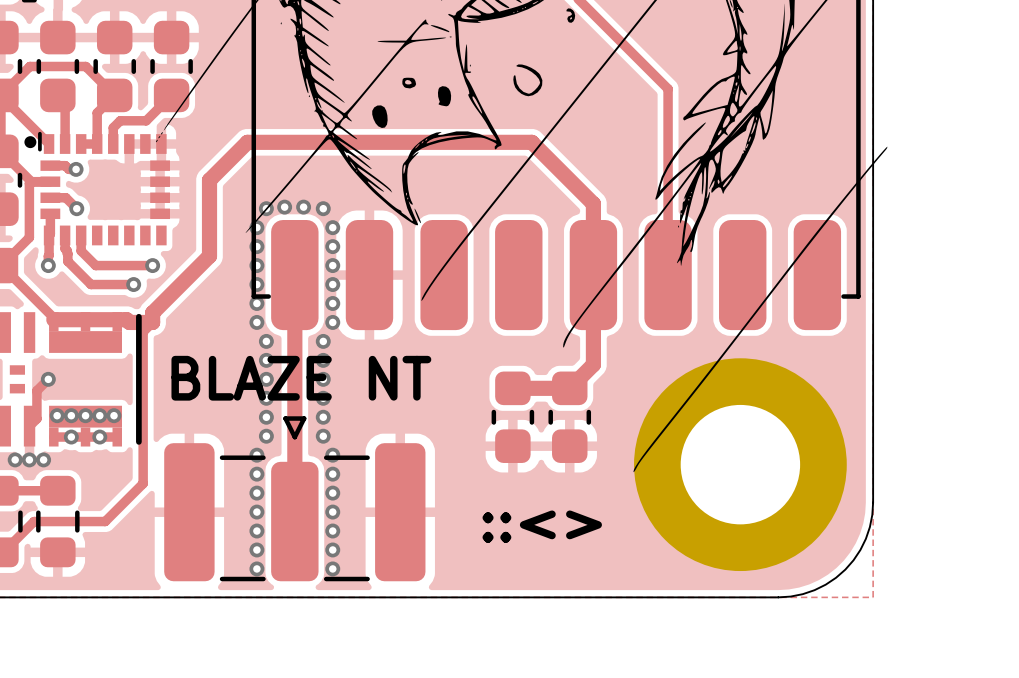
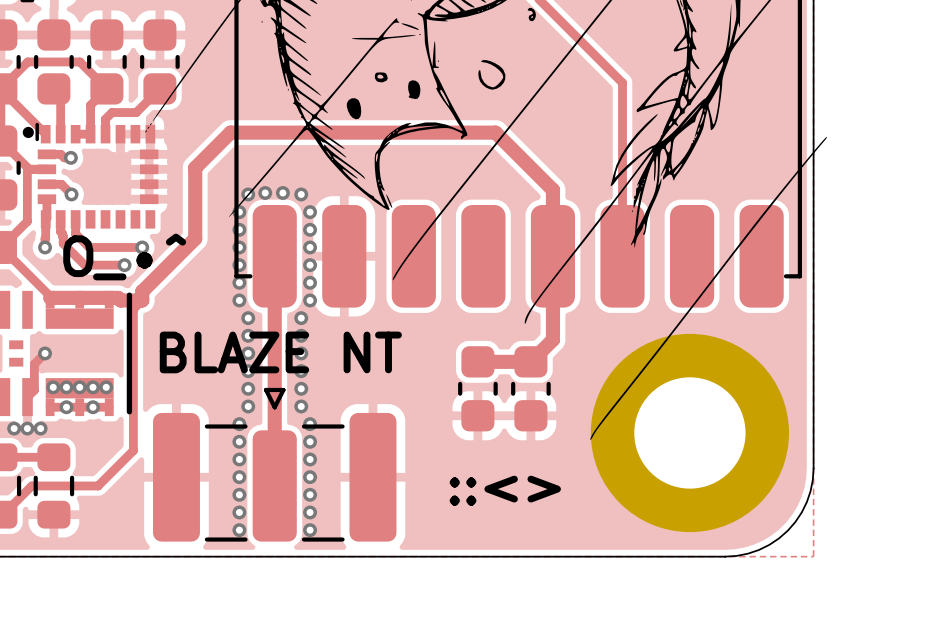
text: none -> O_•^ (124, 257)

